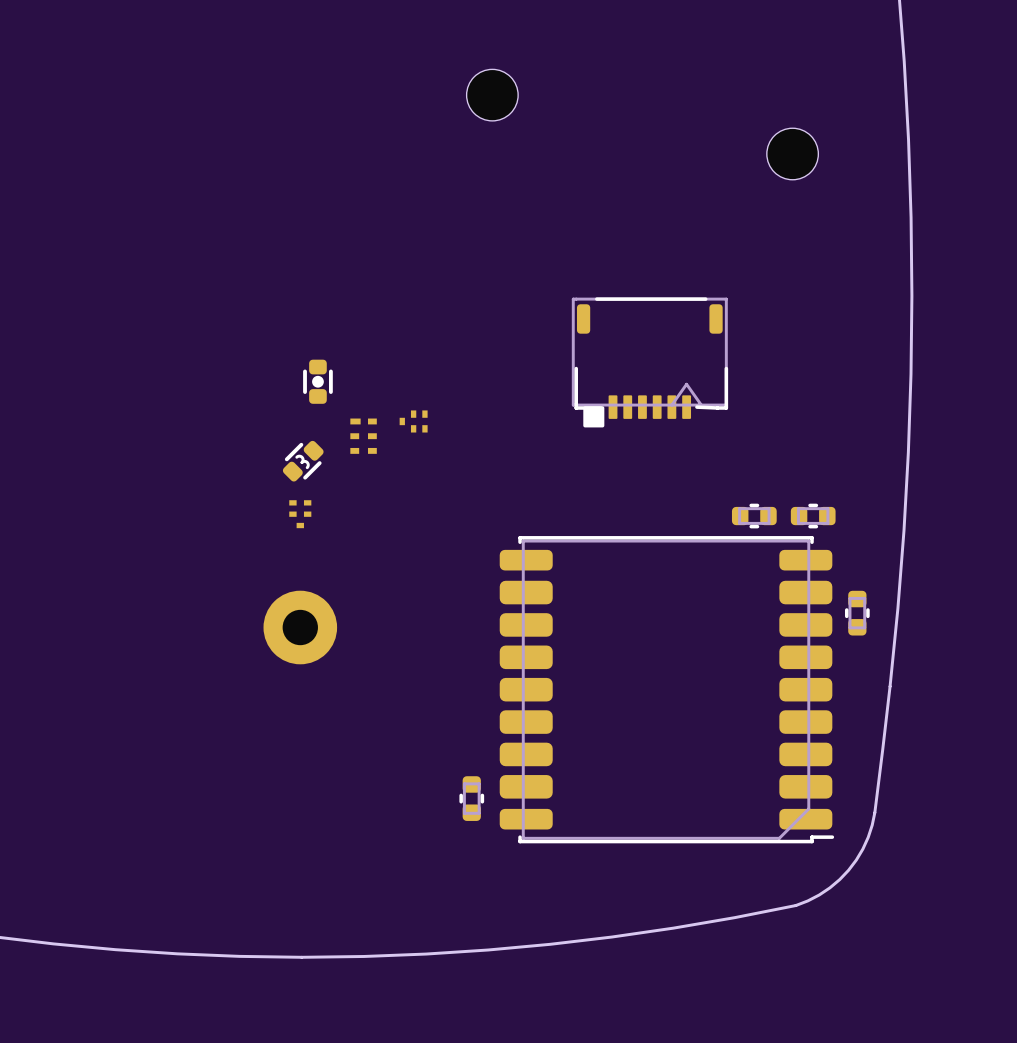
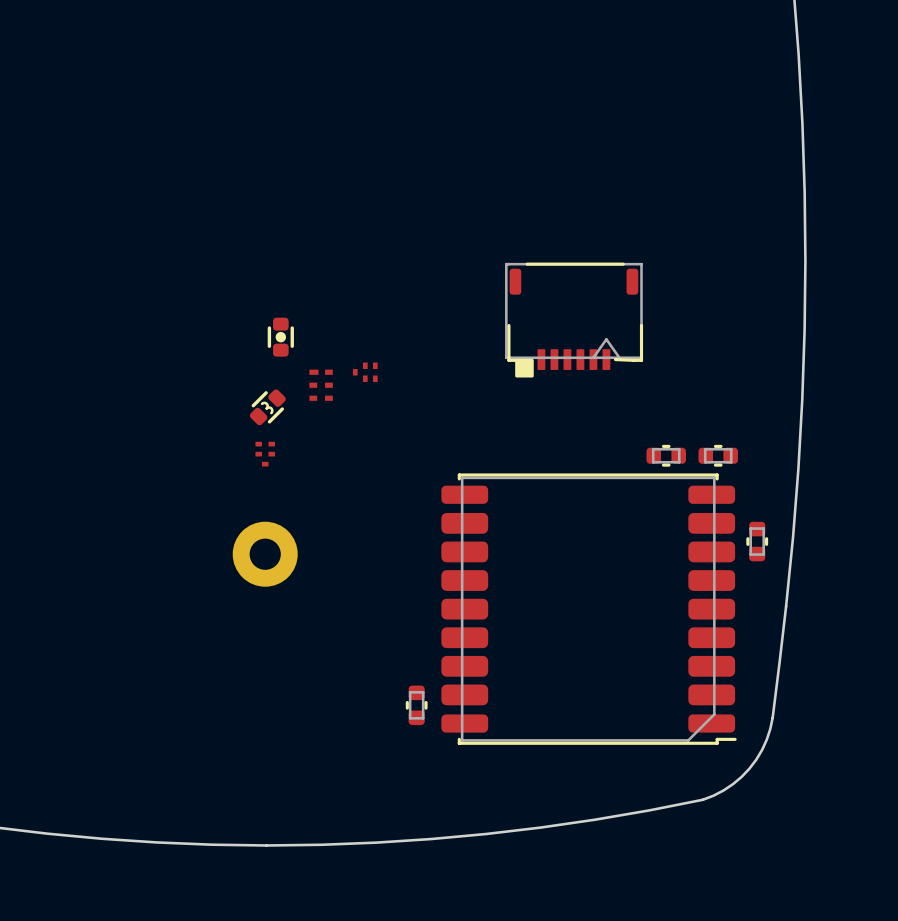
part: (492, 95) -> none
part: (792, 154) -> none

